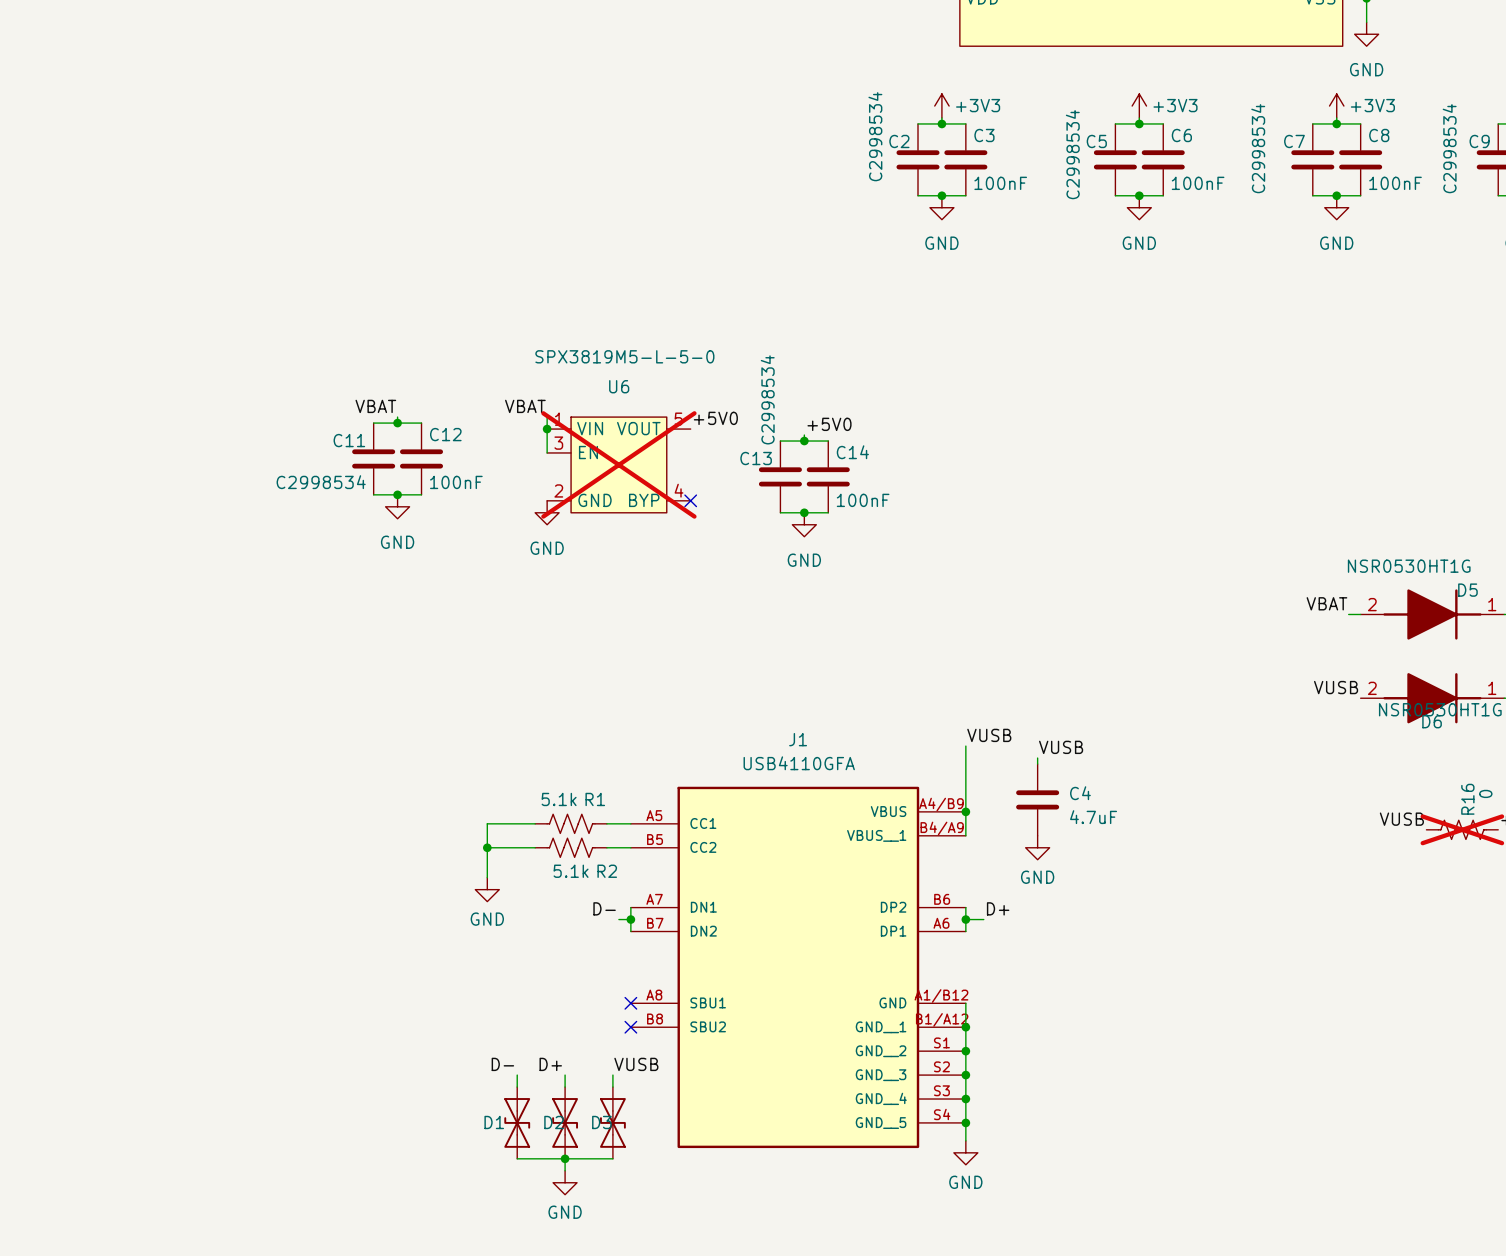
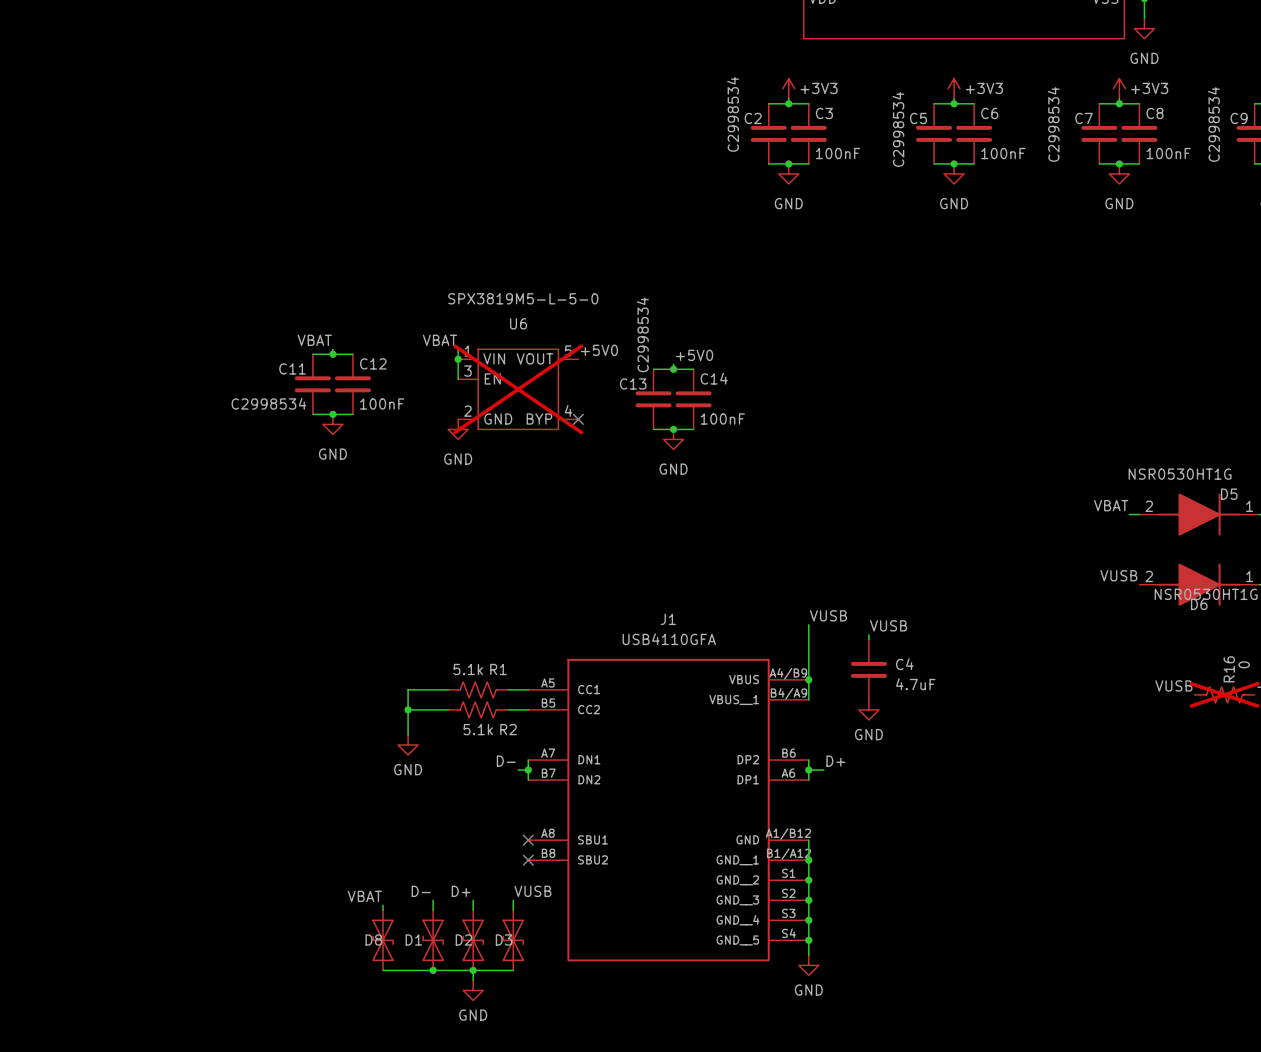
label: none -> VBAT (364, 896)
wire: none -> (383, 905) (383, 910)
D8: none -> (383, 940)
wire: none -> (383, 970) (433, 970)
junction: none -> (433, 970)

